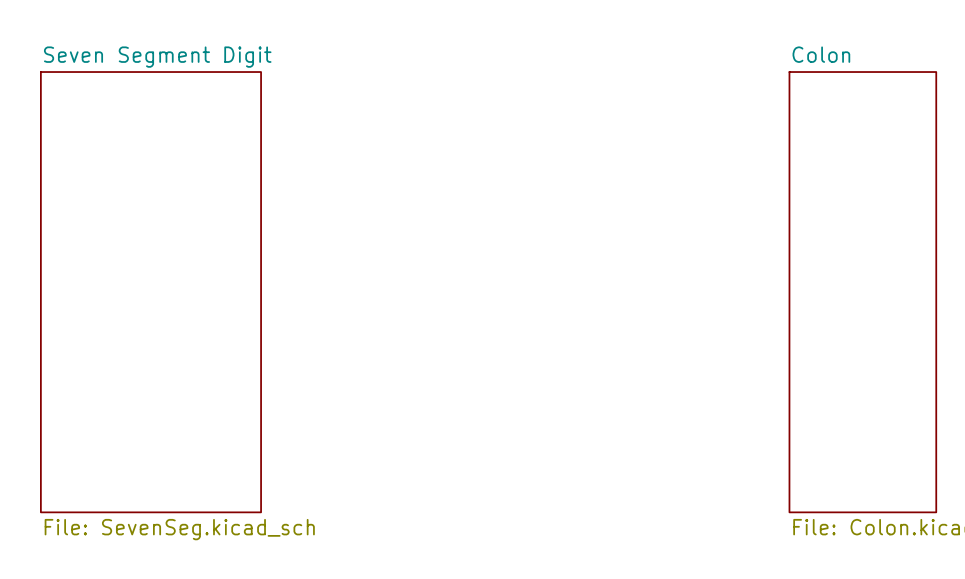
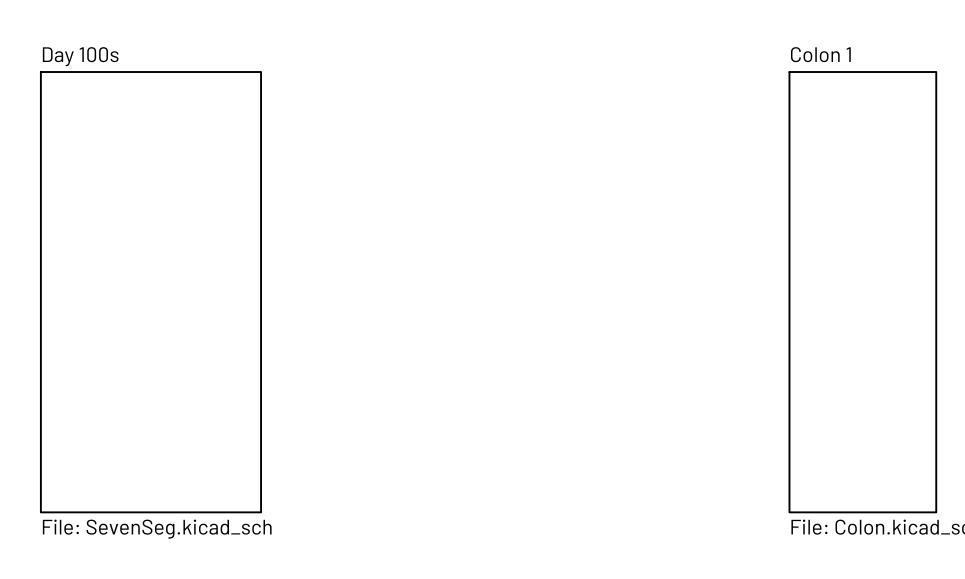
sheet Colon name: Colon (821, 54) -> Colon 1 (820, 54)
sheet Seven Segment Digit name: Seven Segment Digit (157, 57) -> Day 100s (80, 56)

